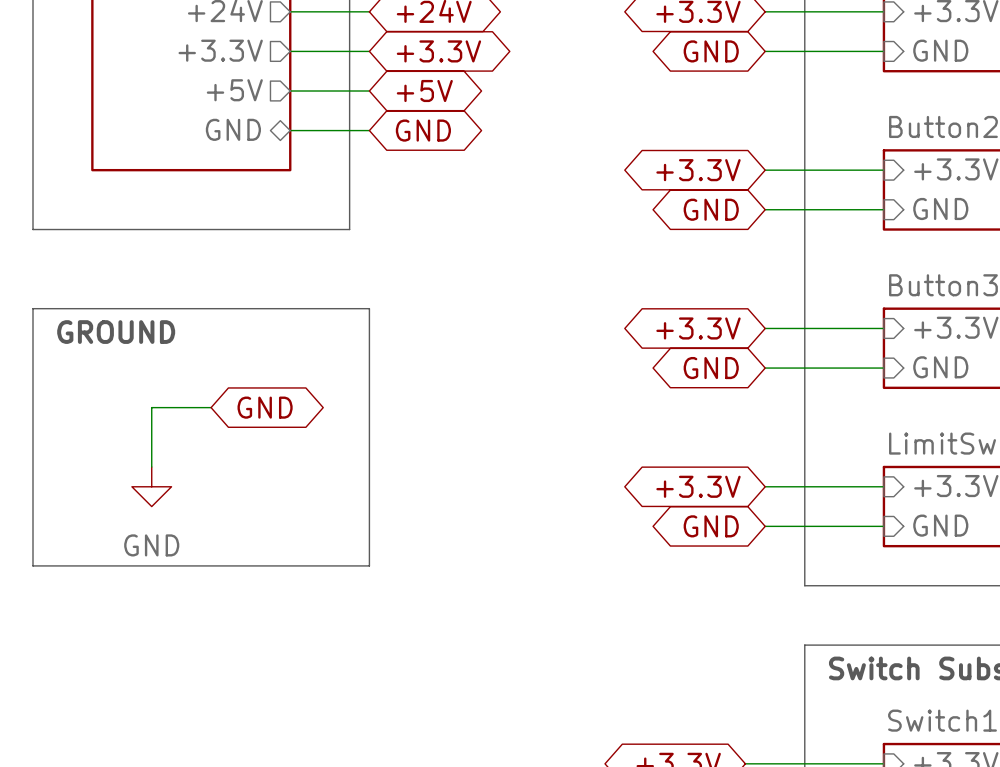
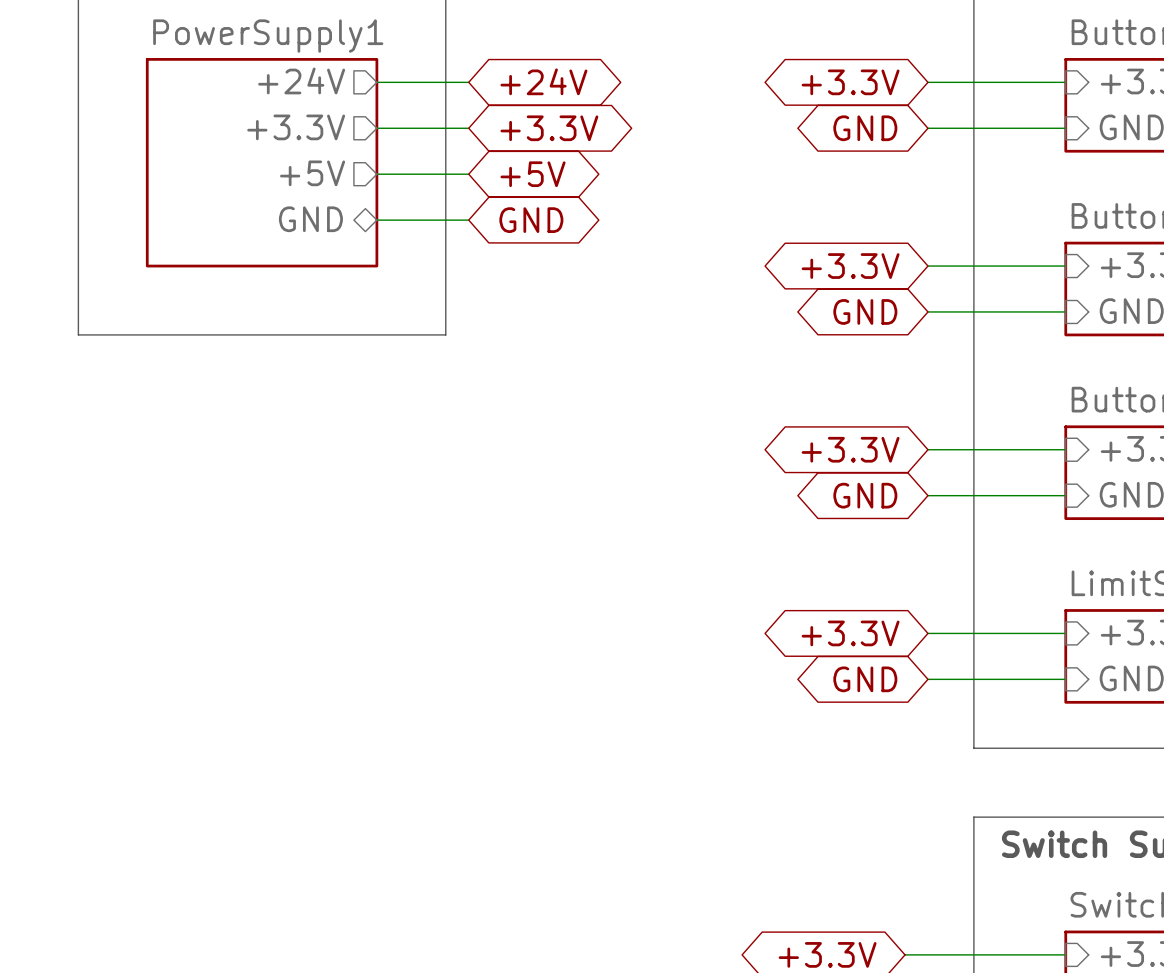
line: (32, 308) (32, 565) (369, 565) (369, 308) (32, 308) -> none
text: GROUND (116, 332) -> none
wire: (211, 407) (151, 407) (151, 466) -> none
global label: GND (265, 407) -> none
power symbol: GND (151, 486) -> none

